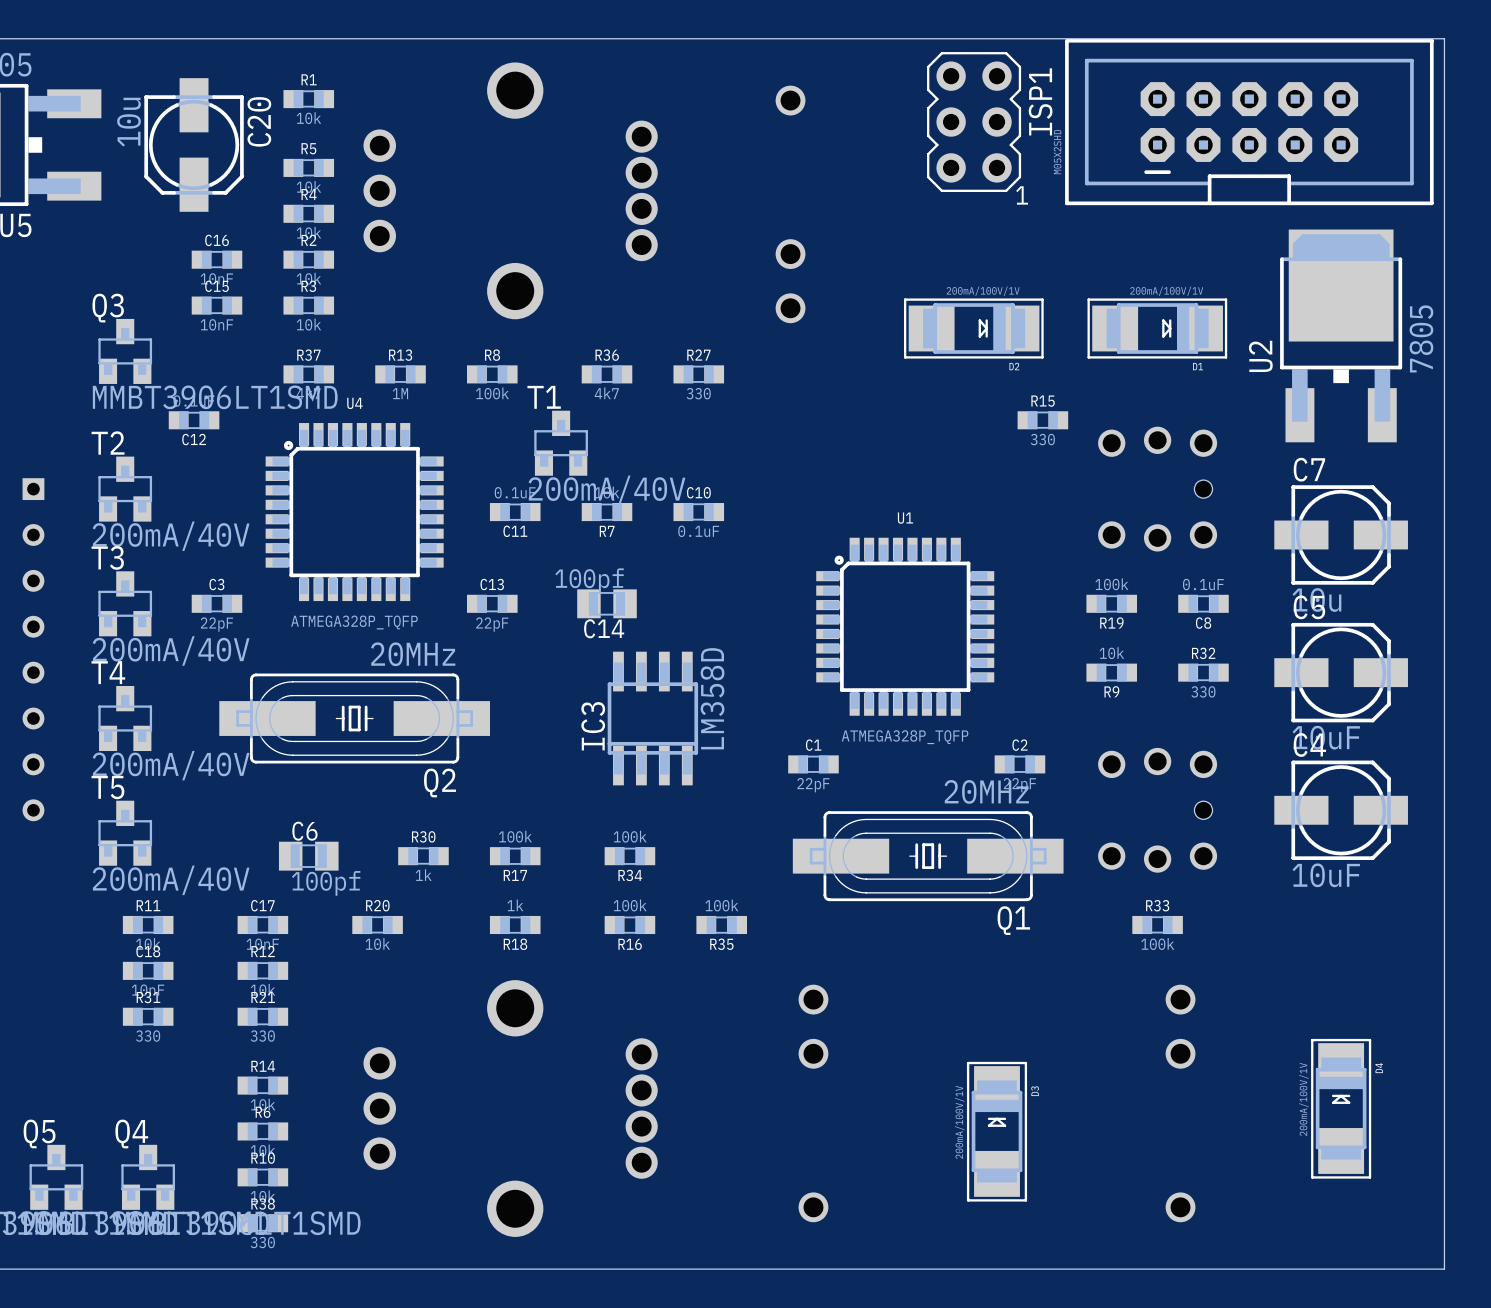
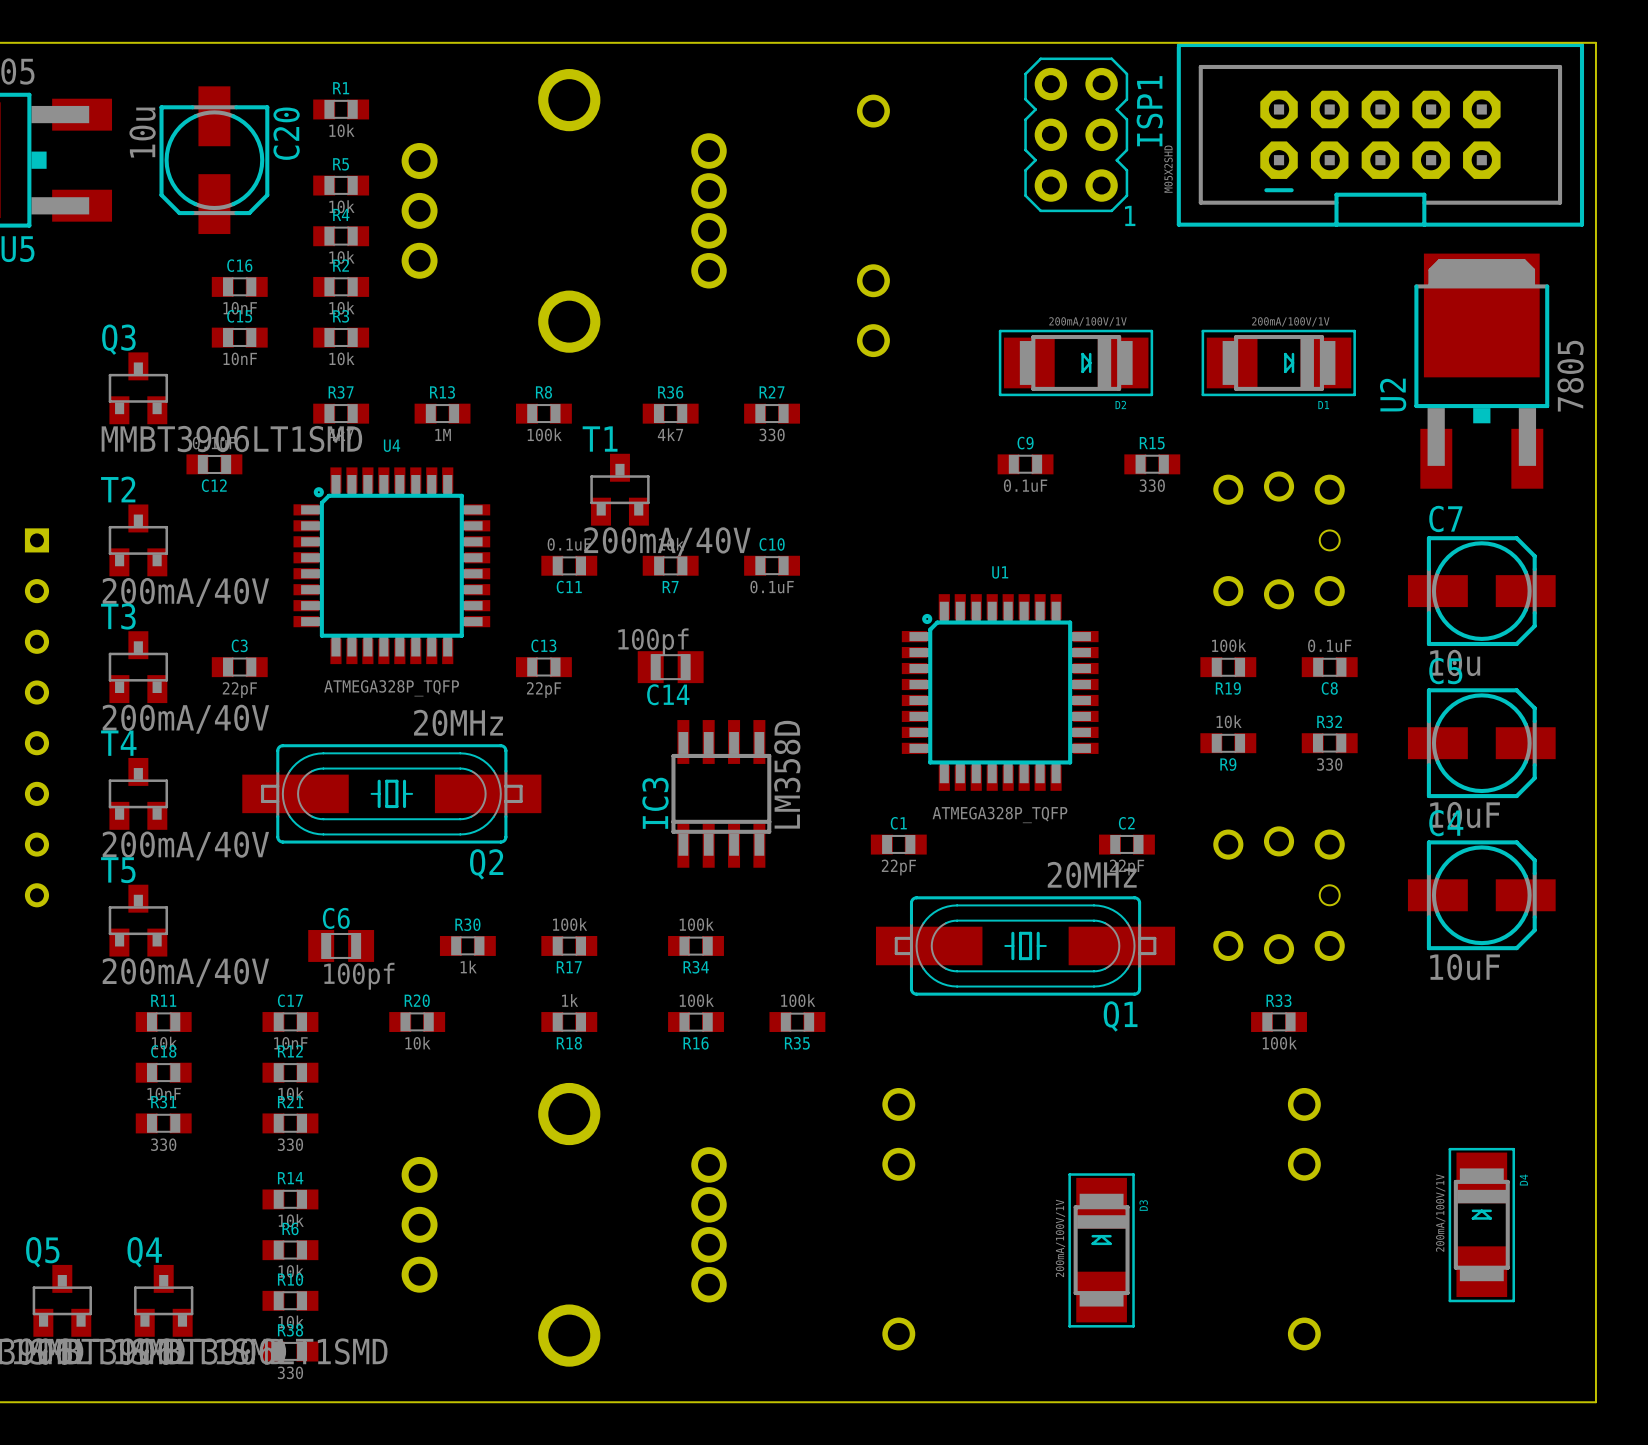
C9: none -> 0.1uF (1025, 464)

